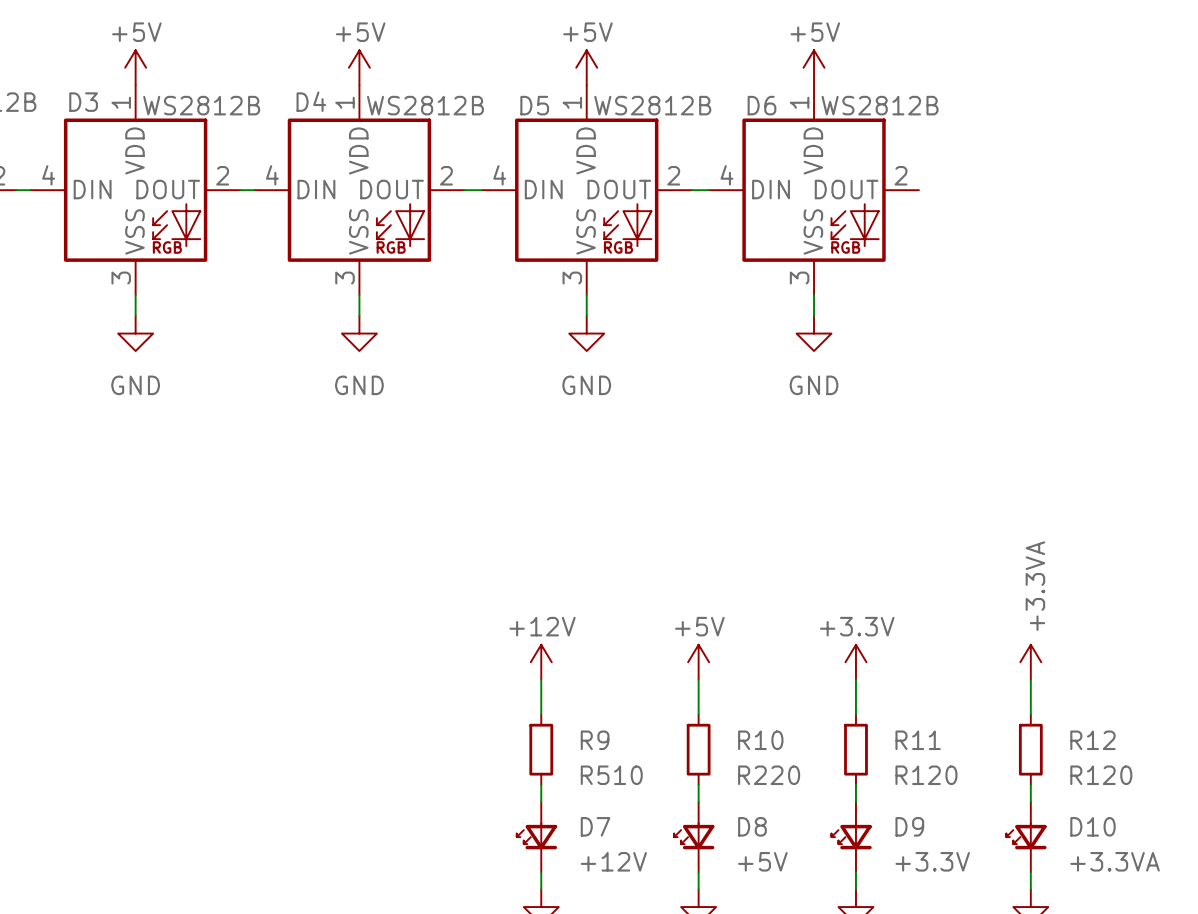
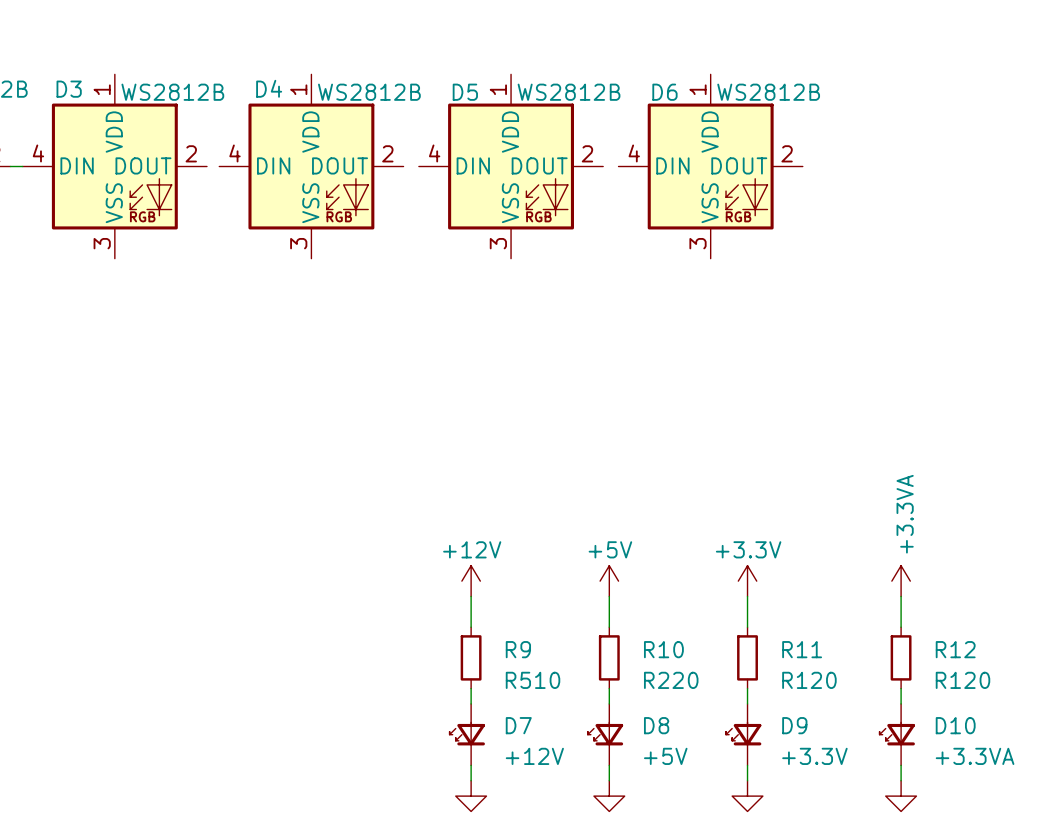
power symbol: +5V (135, 67) -> none
power symbol: +5V (359, 67) -> none
power symbol: +5V (586, 67) -> none
power symbol: +5V (814, 67) -> none
wire: (240, 190) (254, 190) -> none
wire: (464, 190) (481, 190) -> none
wire: (691, 190) (709, 190) -> none
wire: (135, 295) (135, 316) -> none
wire: (359, 295) (359, 316) -> none
wire: (586, 295) (586, 316) -> none
wire: (814, 295) (814, 316) -> none
power symbol: GND (135, 333) -> none
power symbol: GND (359, 333) -> none
power symbol: GND (586, 333) -> none
power symbol: GND (814, 333) -> none

